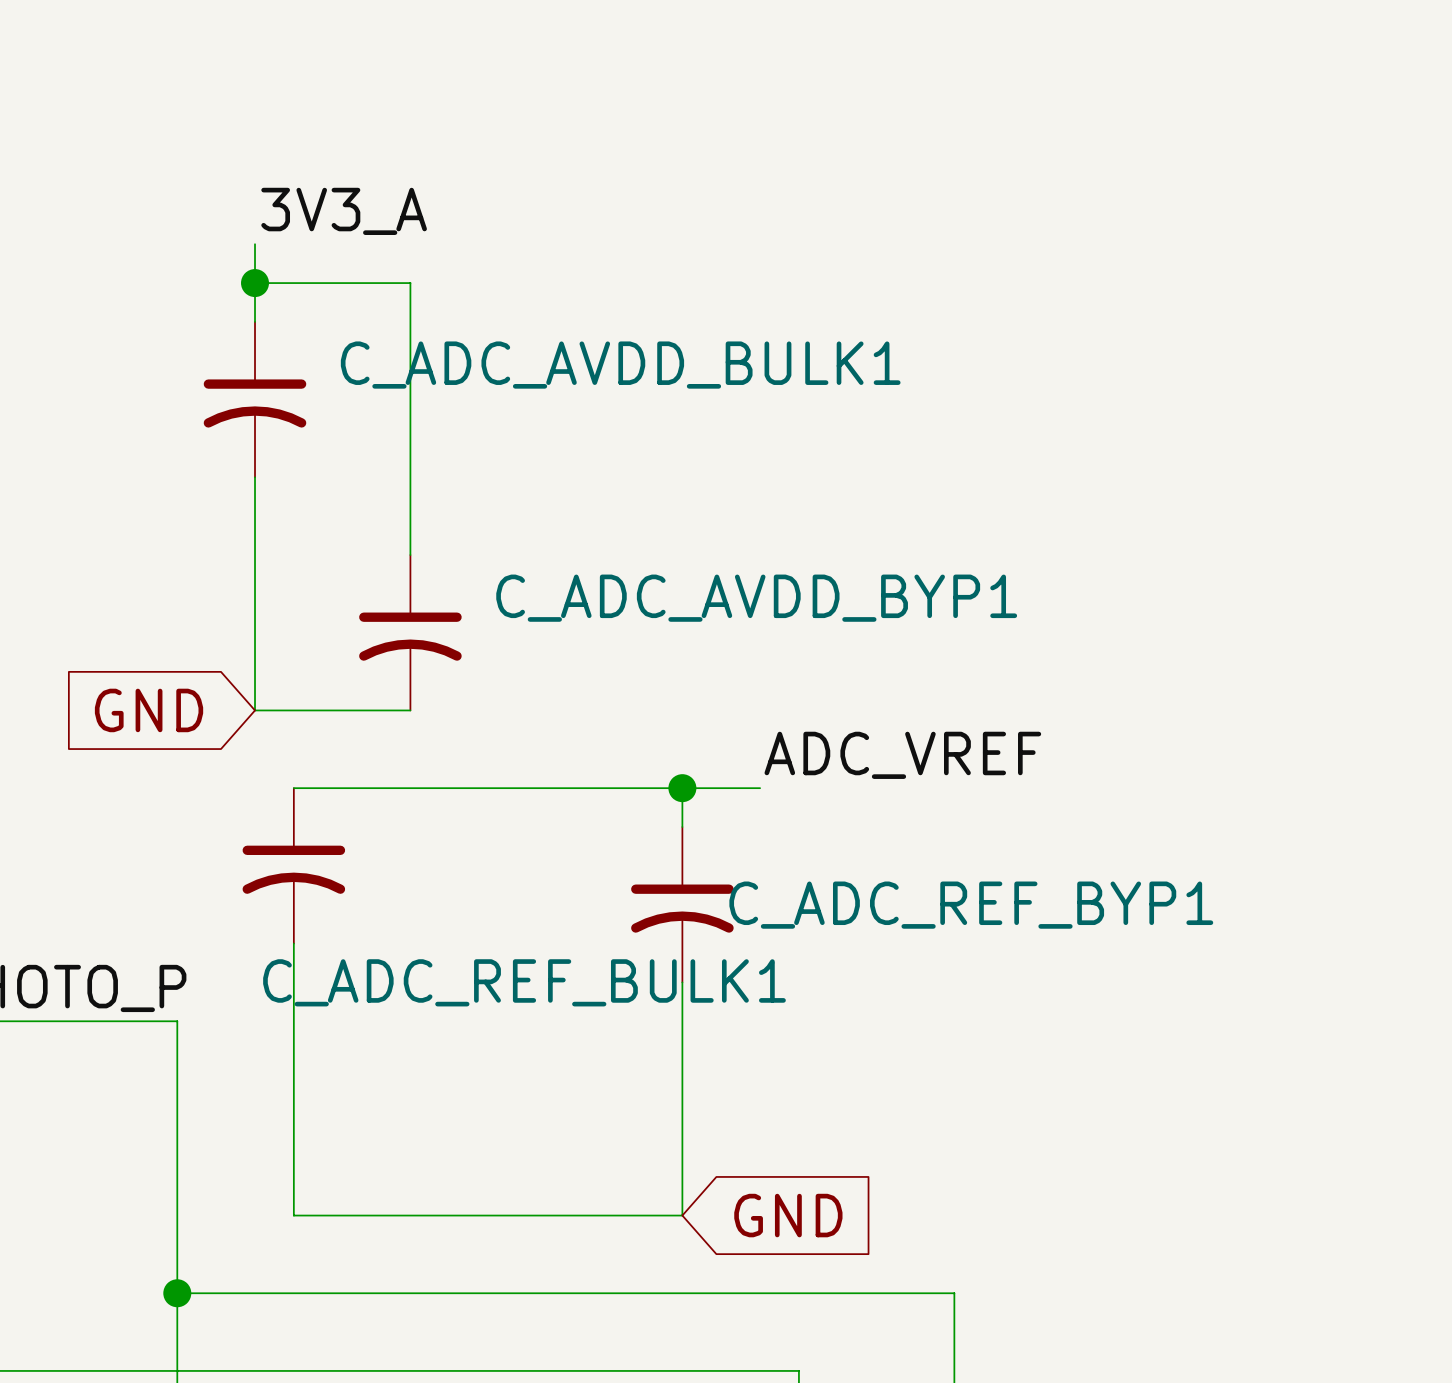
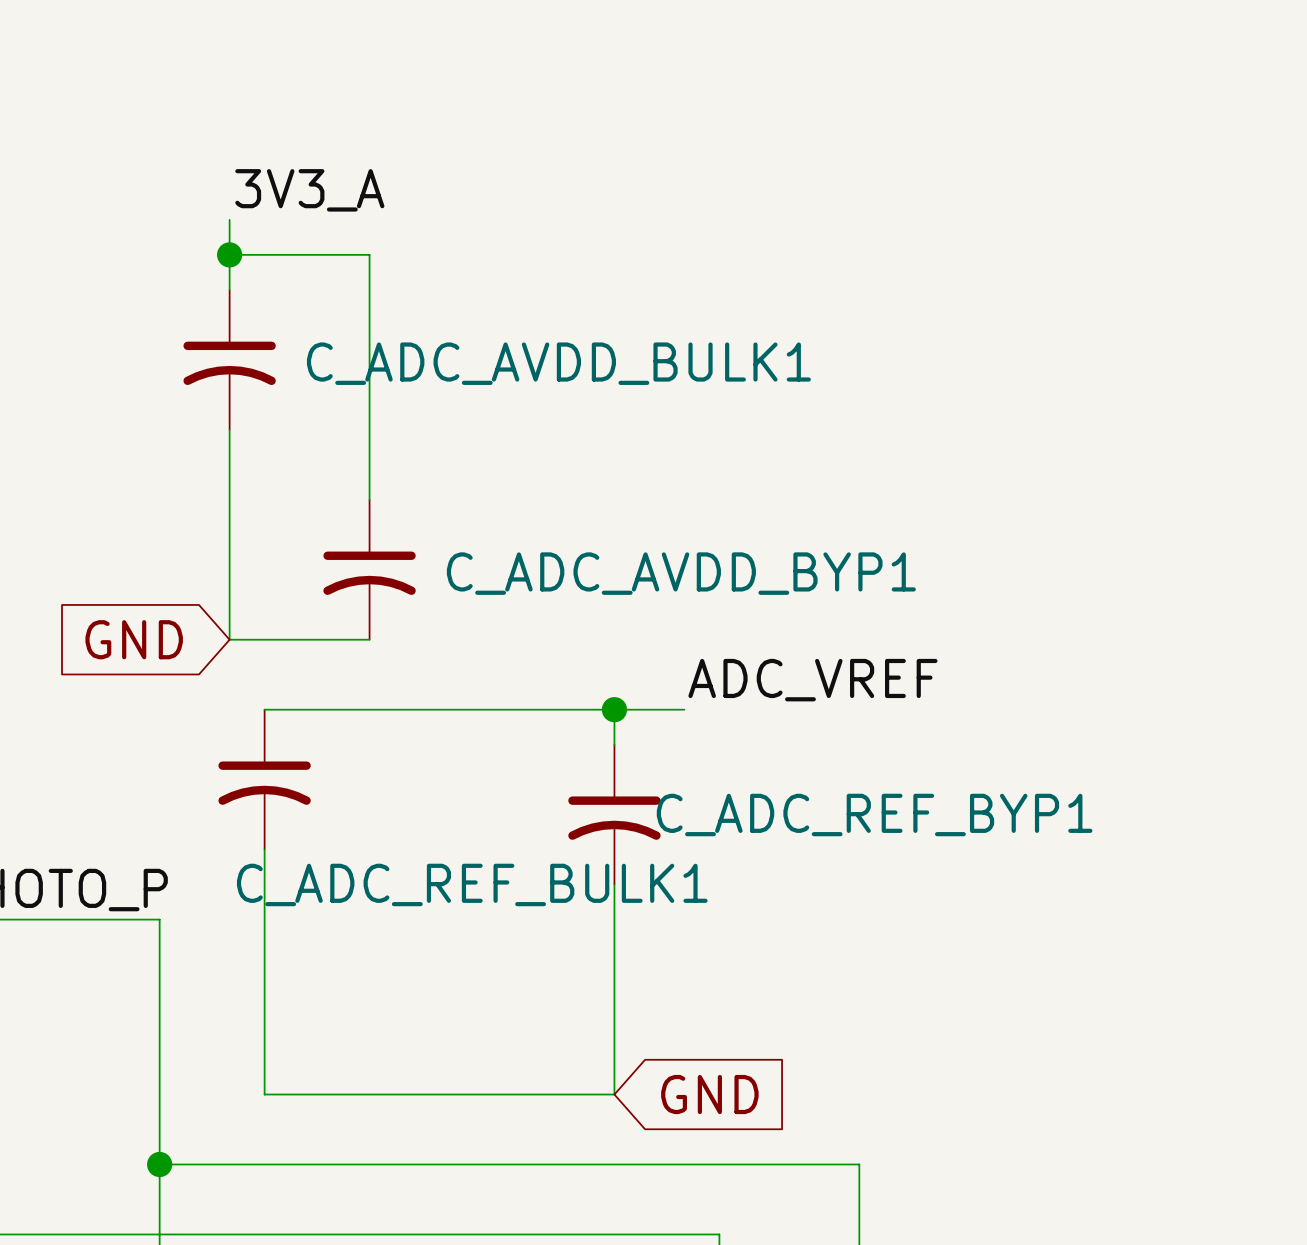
C_ADC_AVDD_BULK1 name position: C_ADC_AVDD_BULK1 (620, 365) -> C_ADC_AVDD_BULK1 (558, 363)
C_ADC_AVDD_BYP1 name position: C_ADC_AVDD_BYP1 (756, 598) -> C_ADC_AVDD_BYP1 (681, 573)

